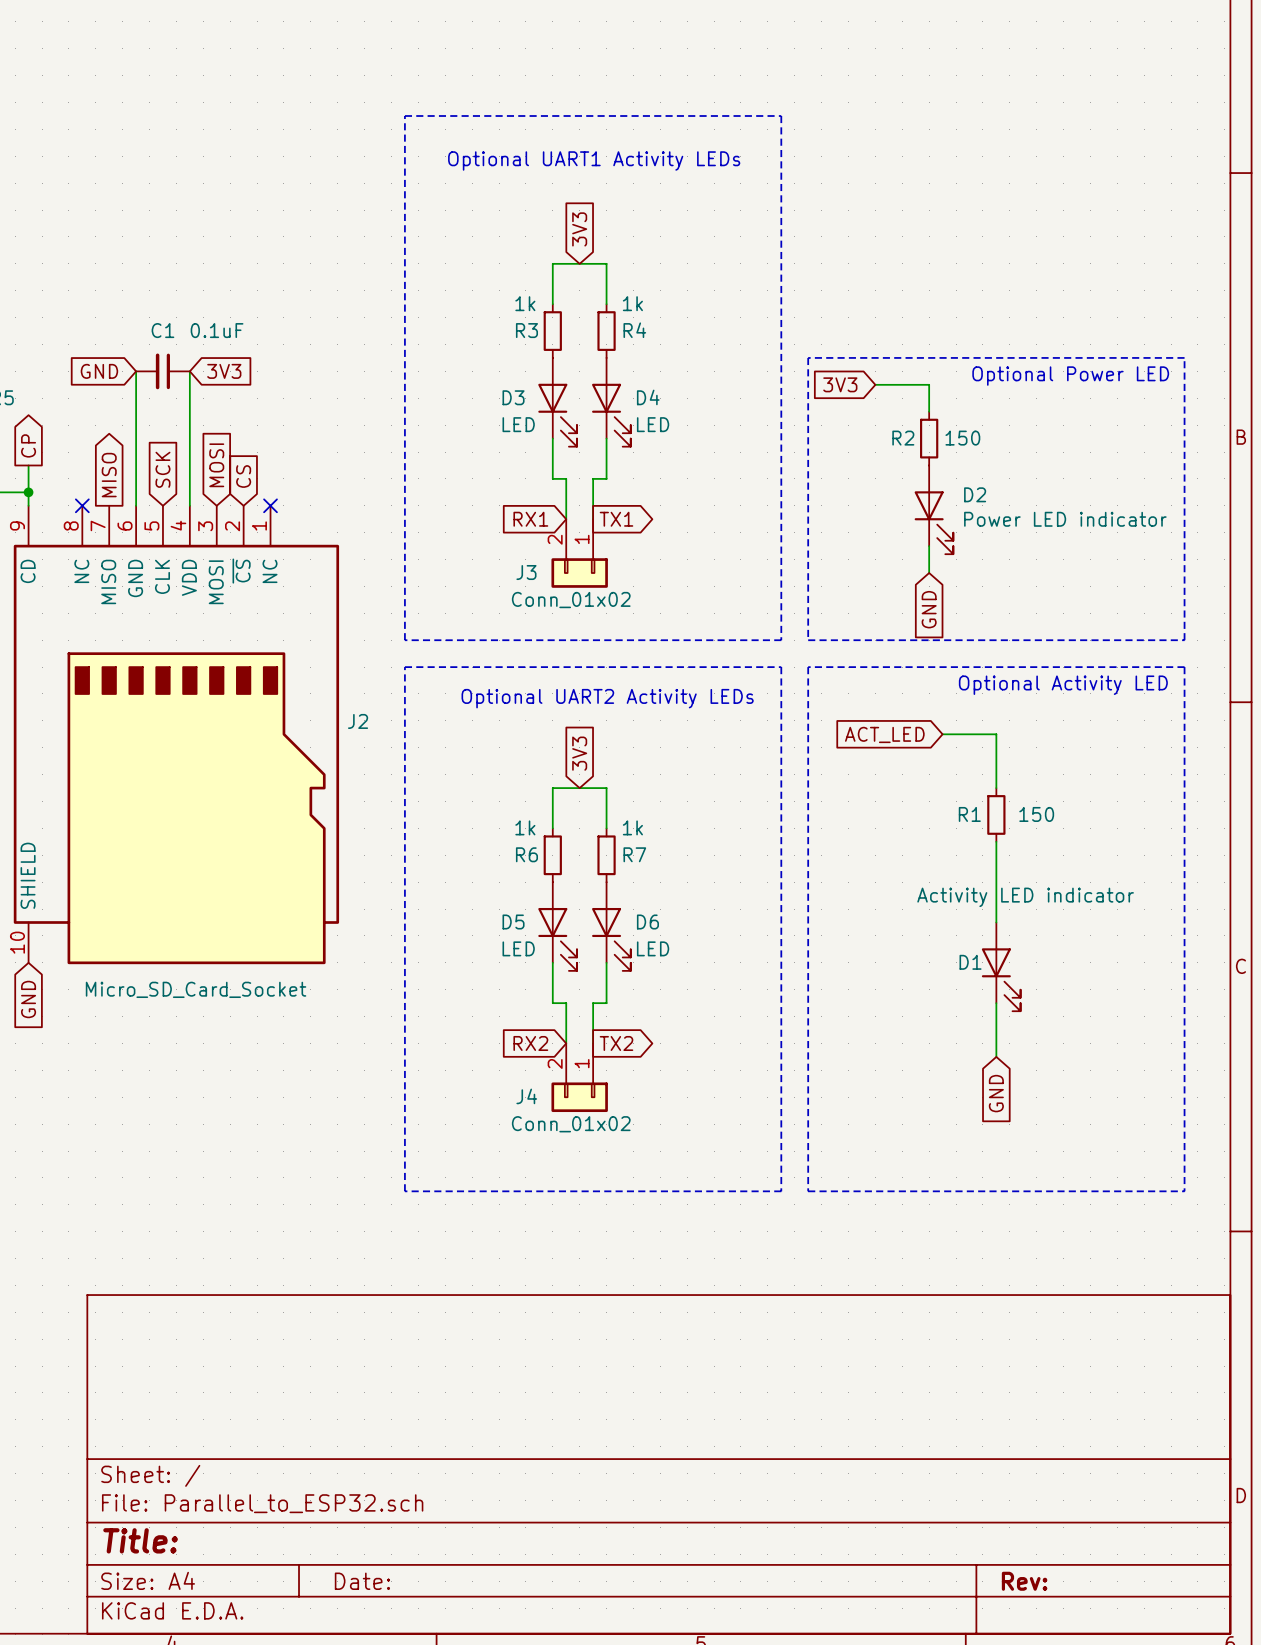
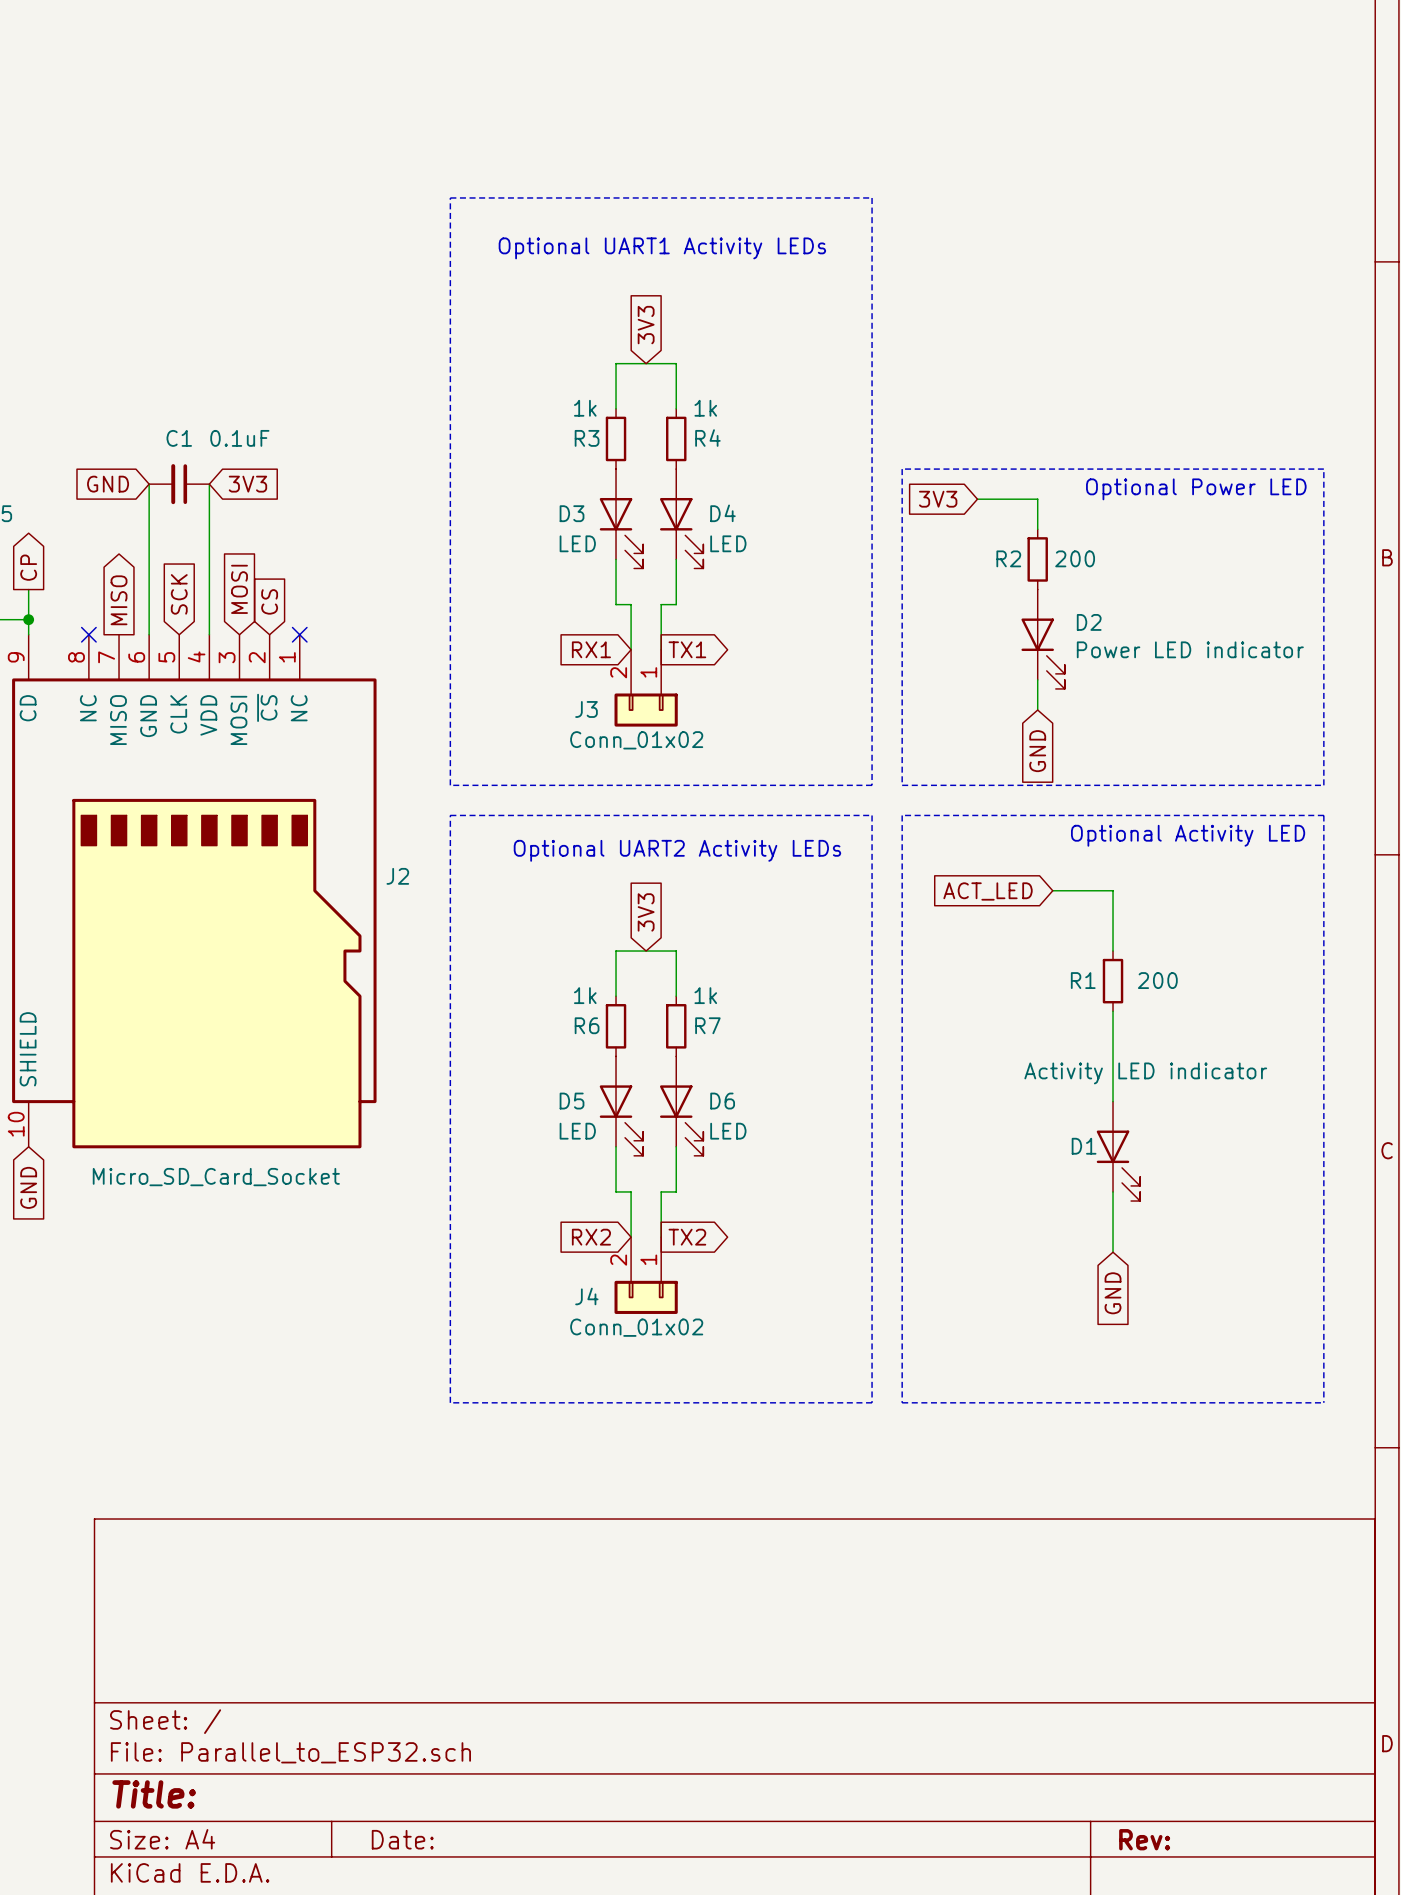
R2 value: 150 (962, 438) -> 200 (1075, 558)
R1 value: 150 (1036, 814) -> 200 (1157, 980)

